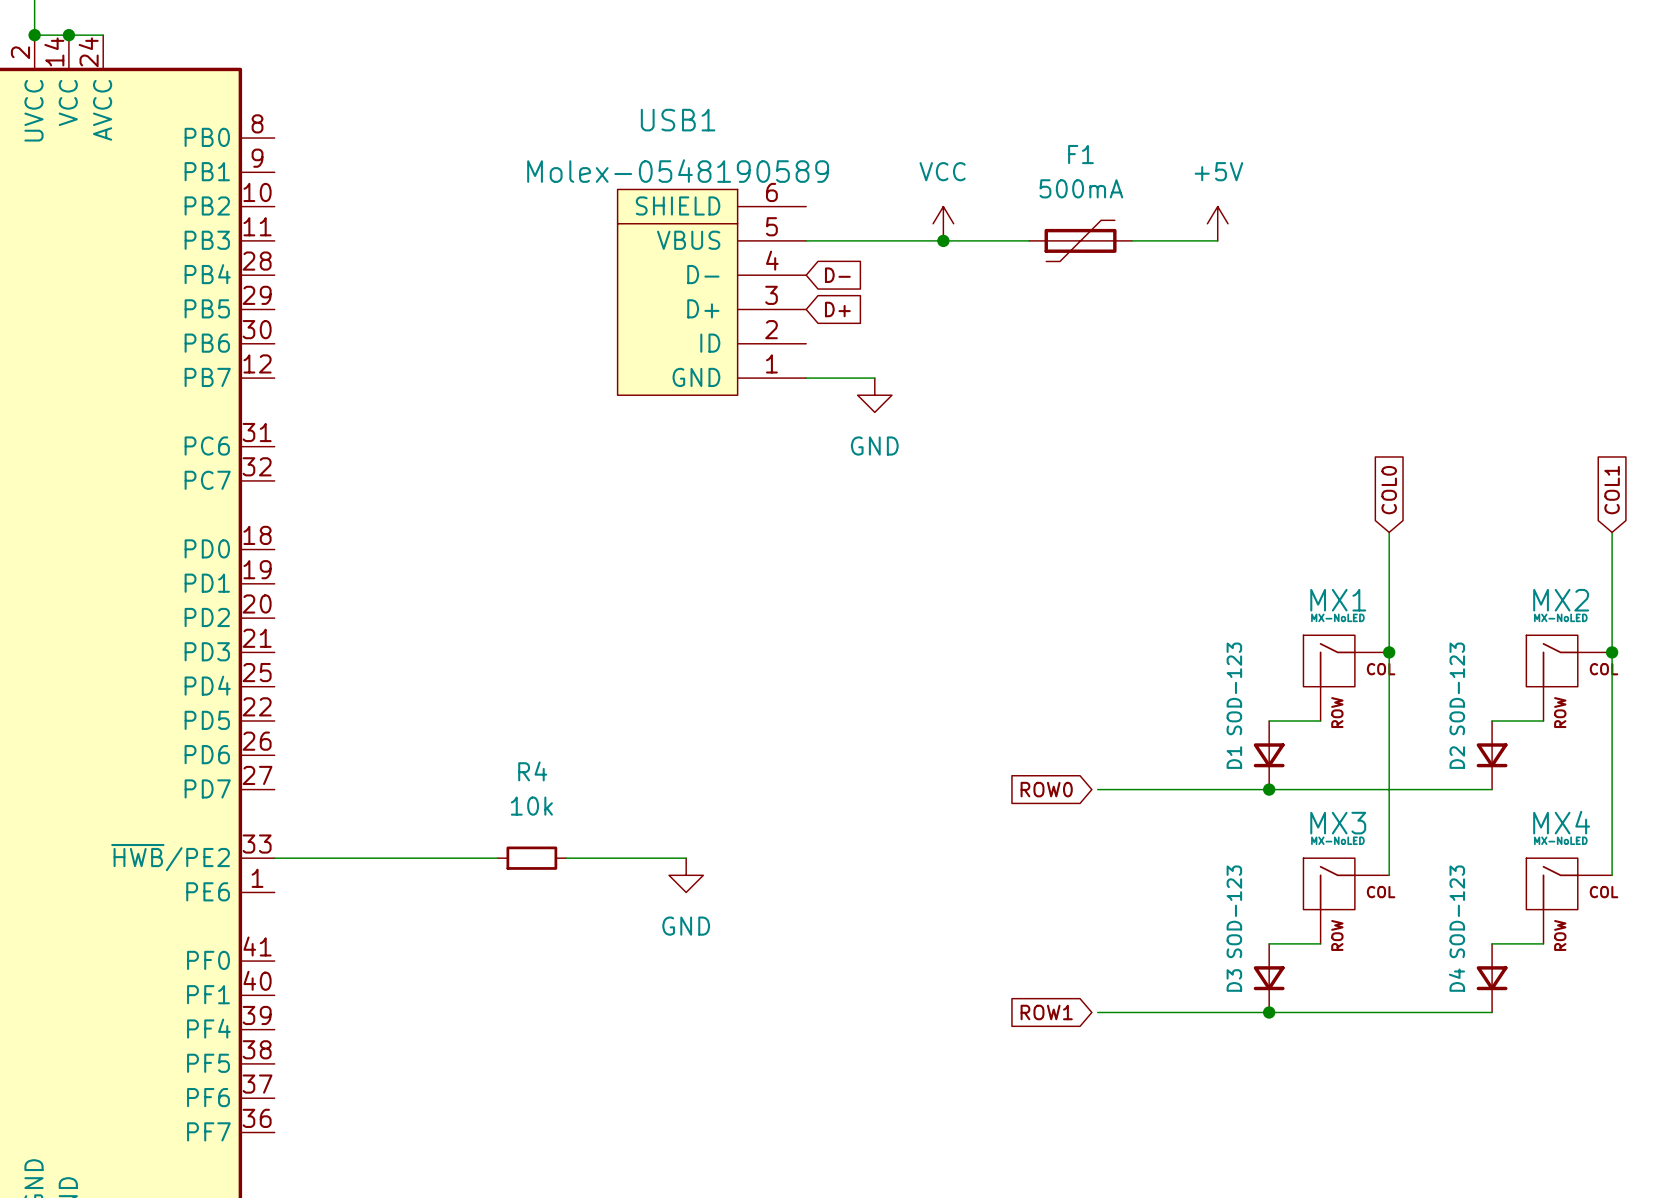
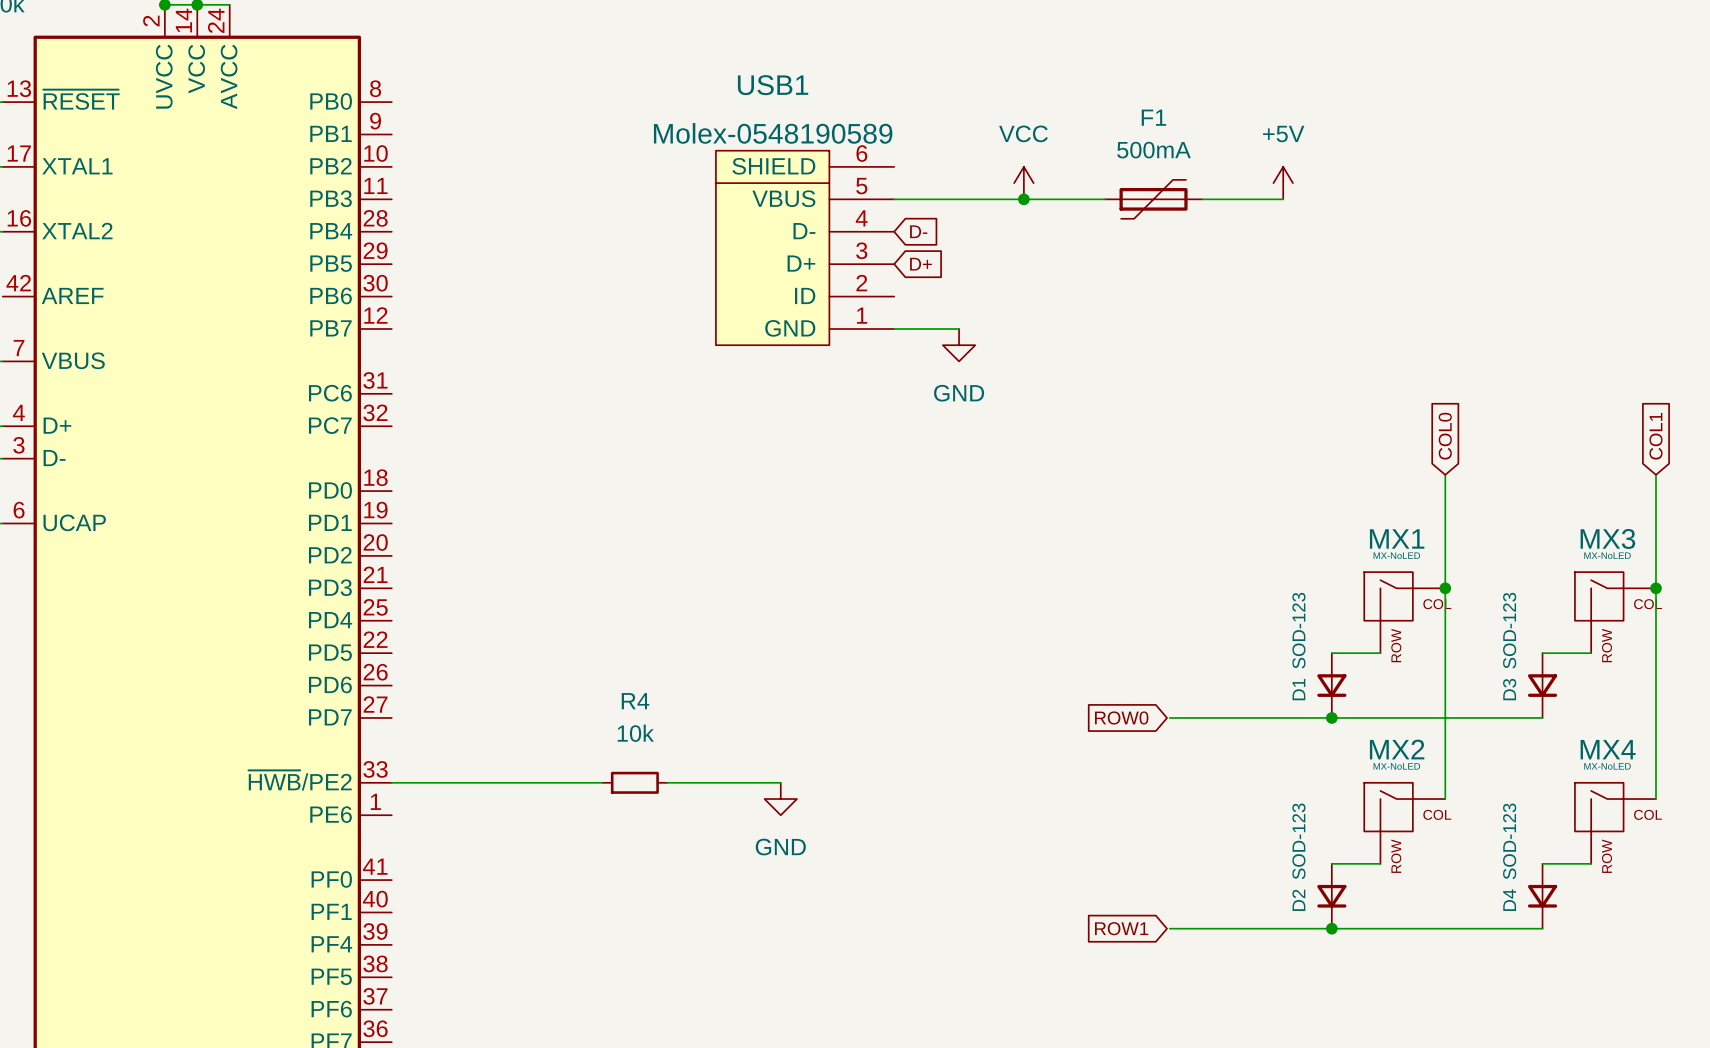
MX2 name: MX2 (1561, 600) -> MX3 (1607, 538)
D2 name: D2 (1457, 757) -> D3 (1509, 689)
MX3 name: MX3 (1338, 823) -> MX2 (1397, 749)
D3 name: D3 (1234, 980) -> D2 (1298, 900)

